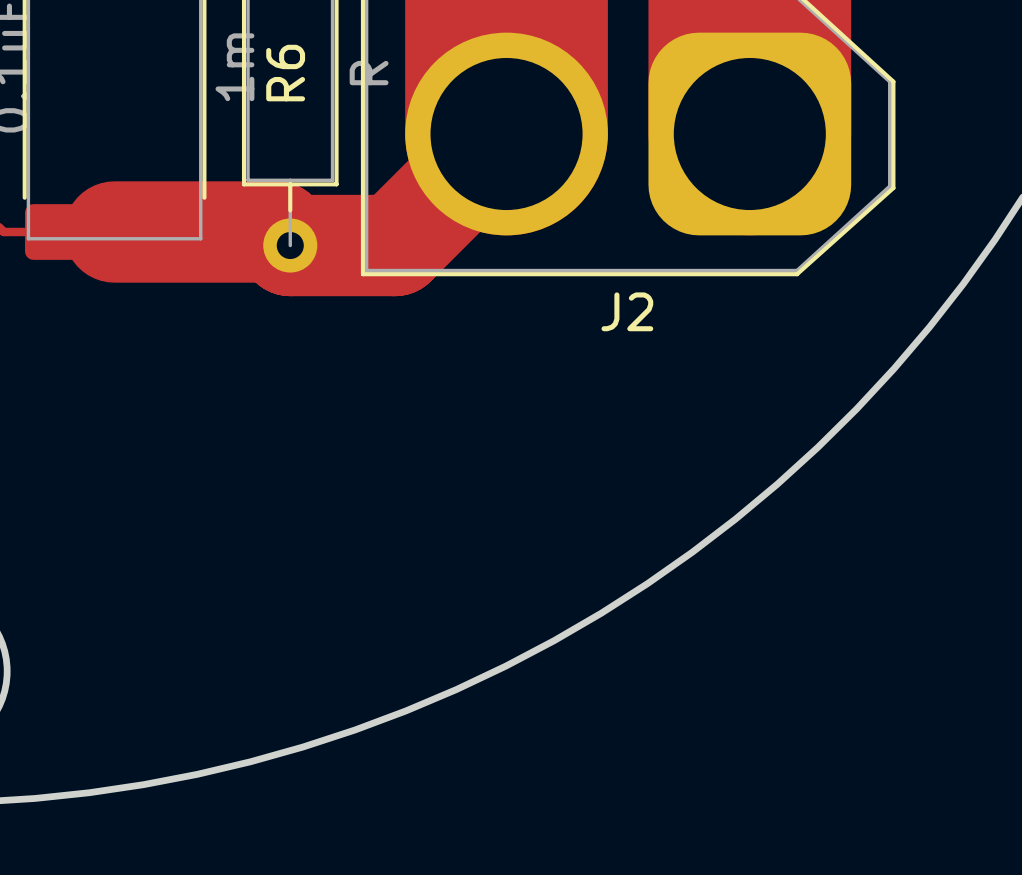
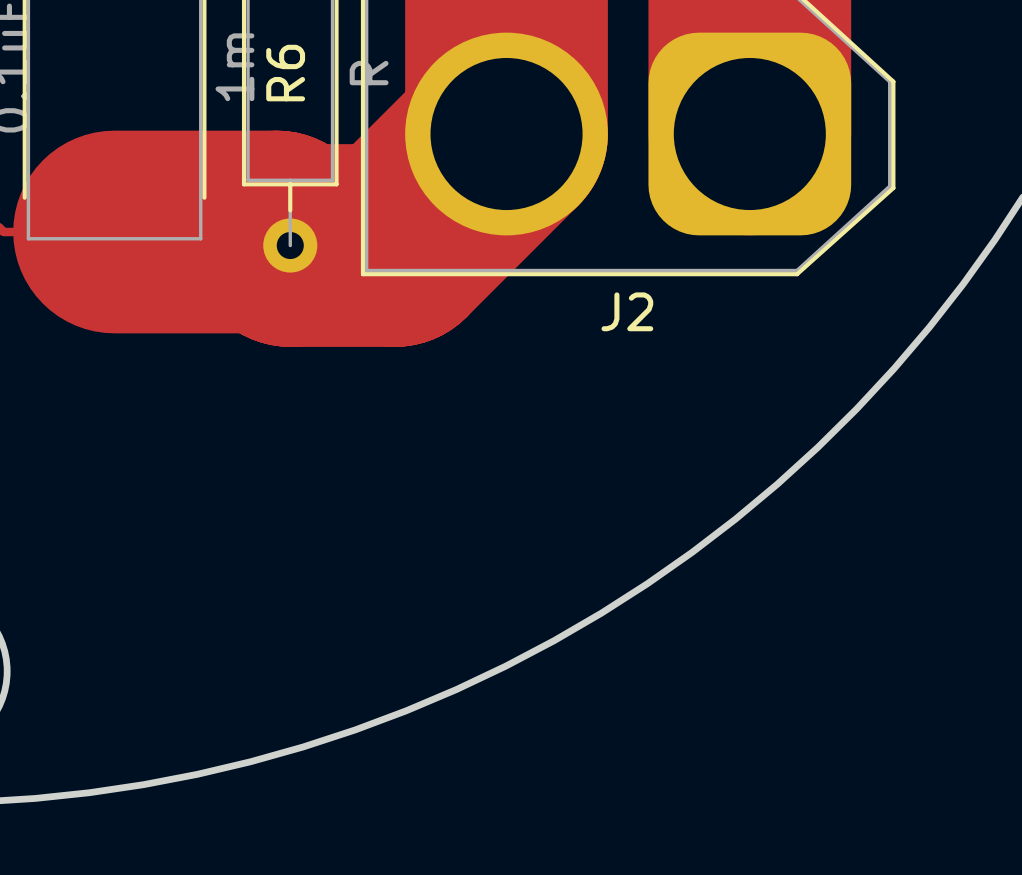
top track width: thin (506, 134) (395, 245) (290, 245) (276, 232) (114, 232) -> thick (506, 134) (395, 245) (290, 245) (276, 232) (114, 232)

